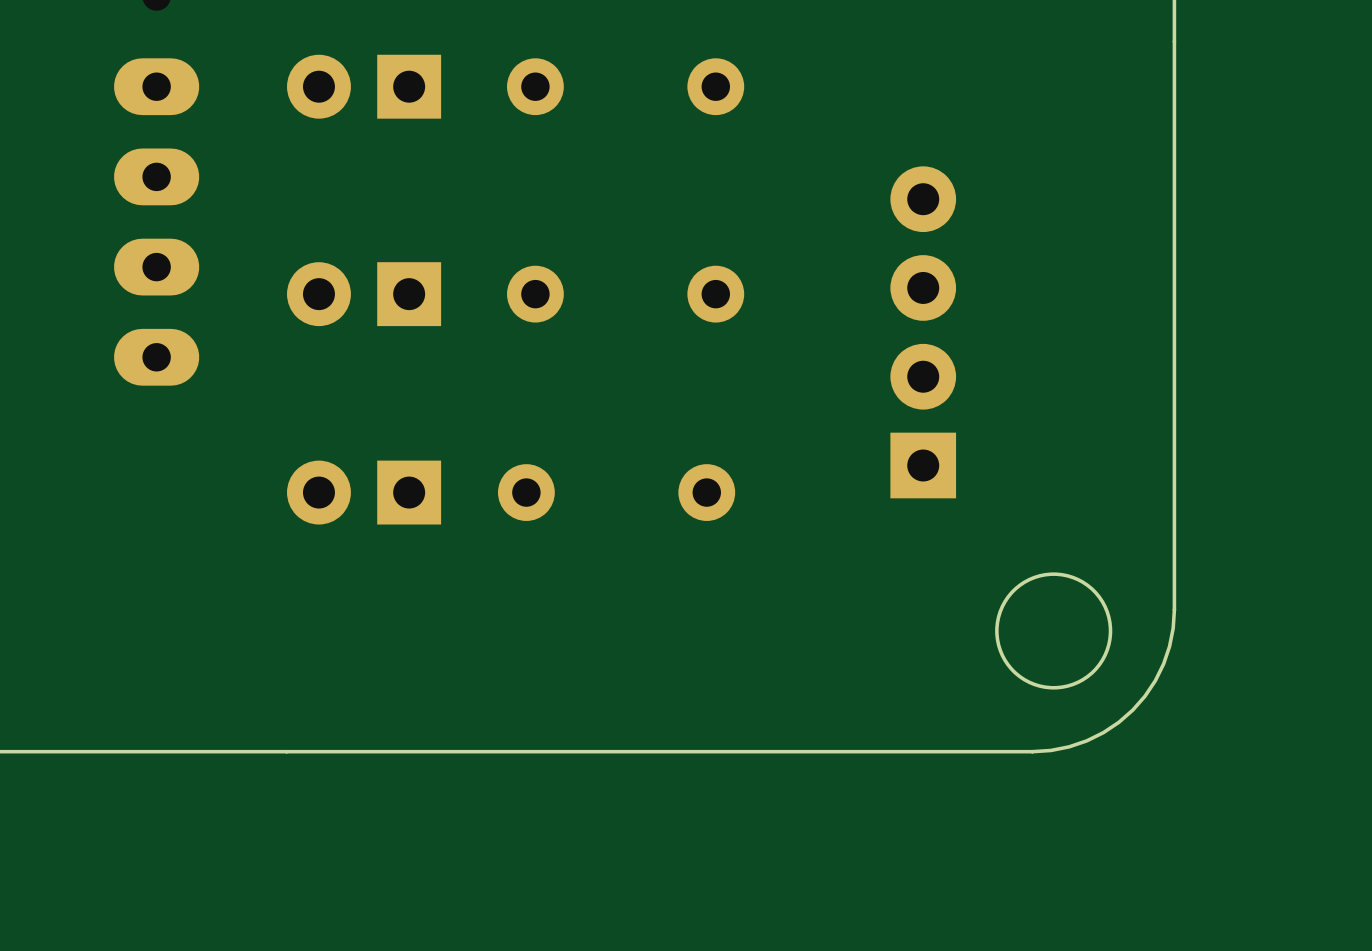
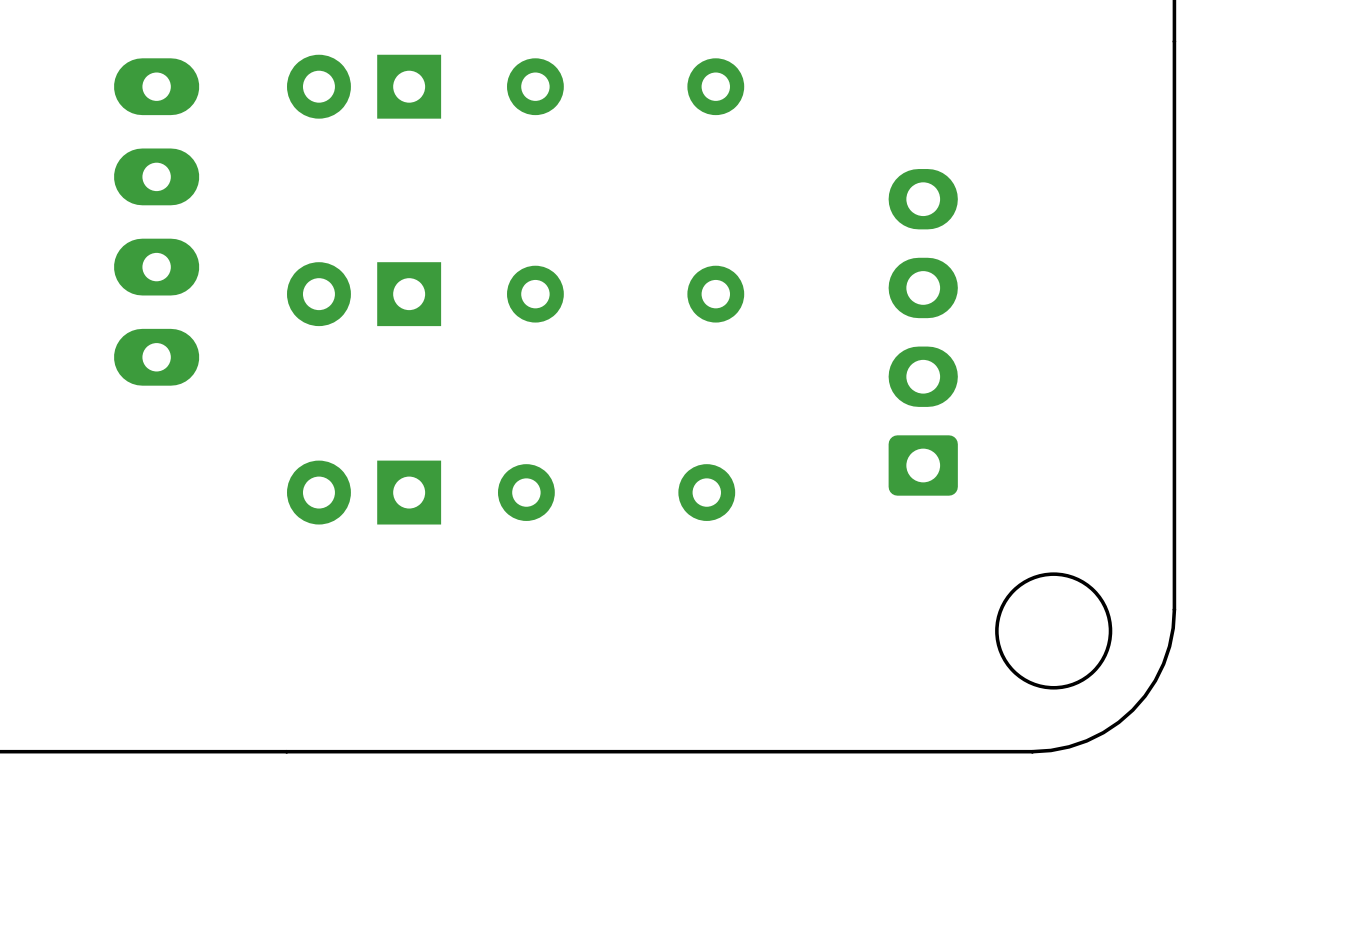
part footprint: [890, 166, 957, 499] -> [888, 169, 958, 496]

